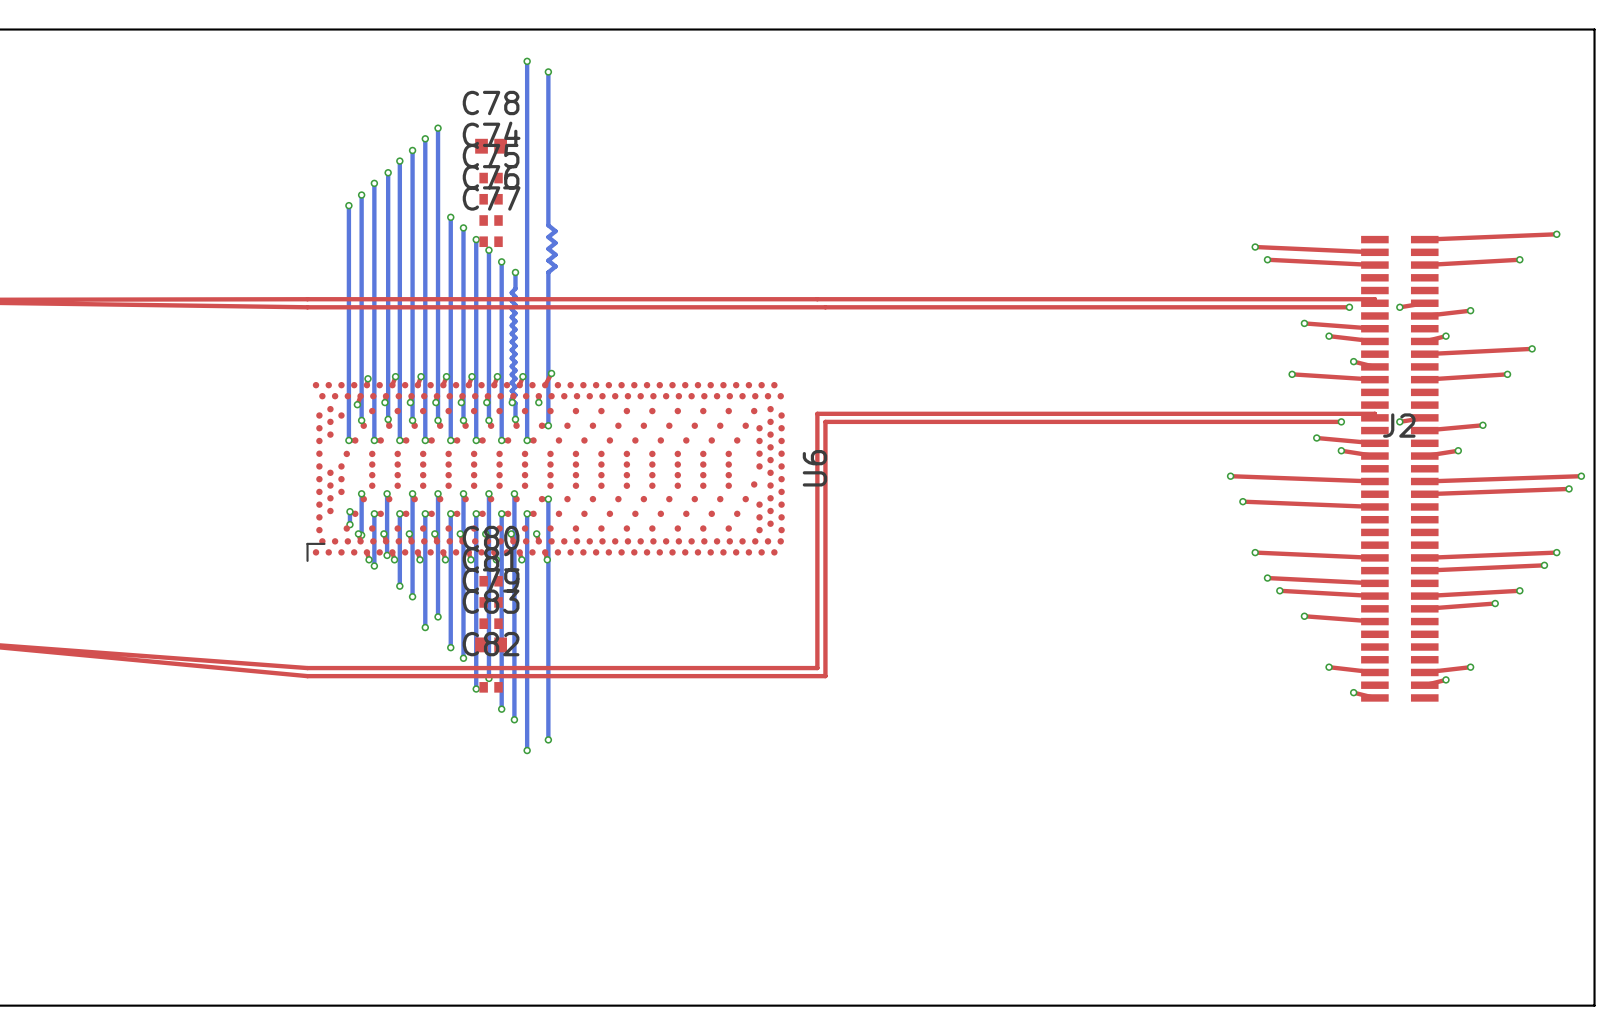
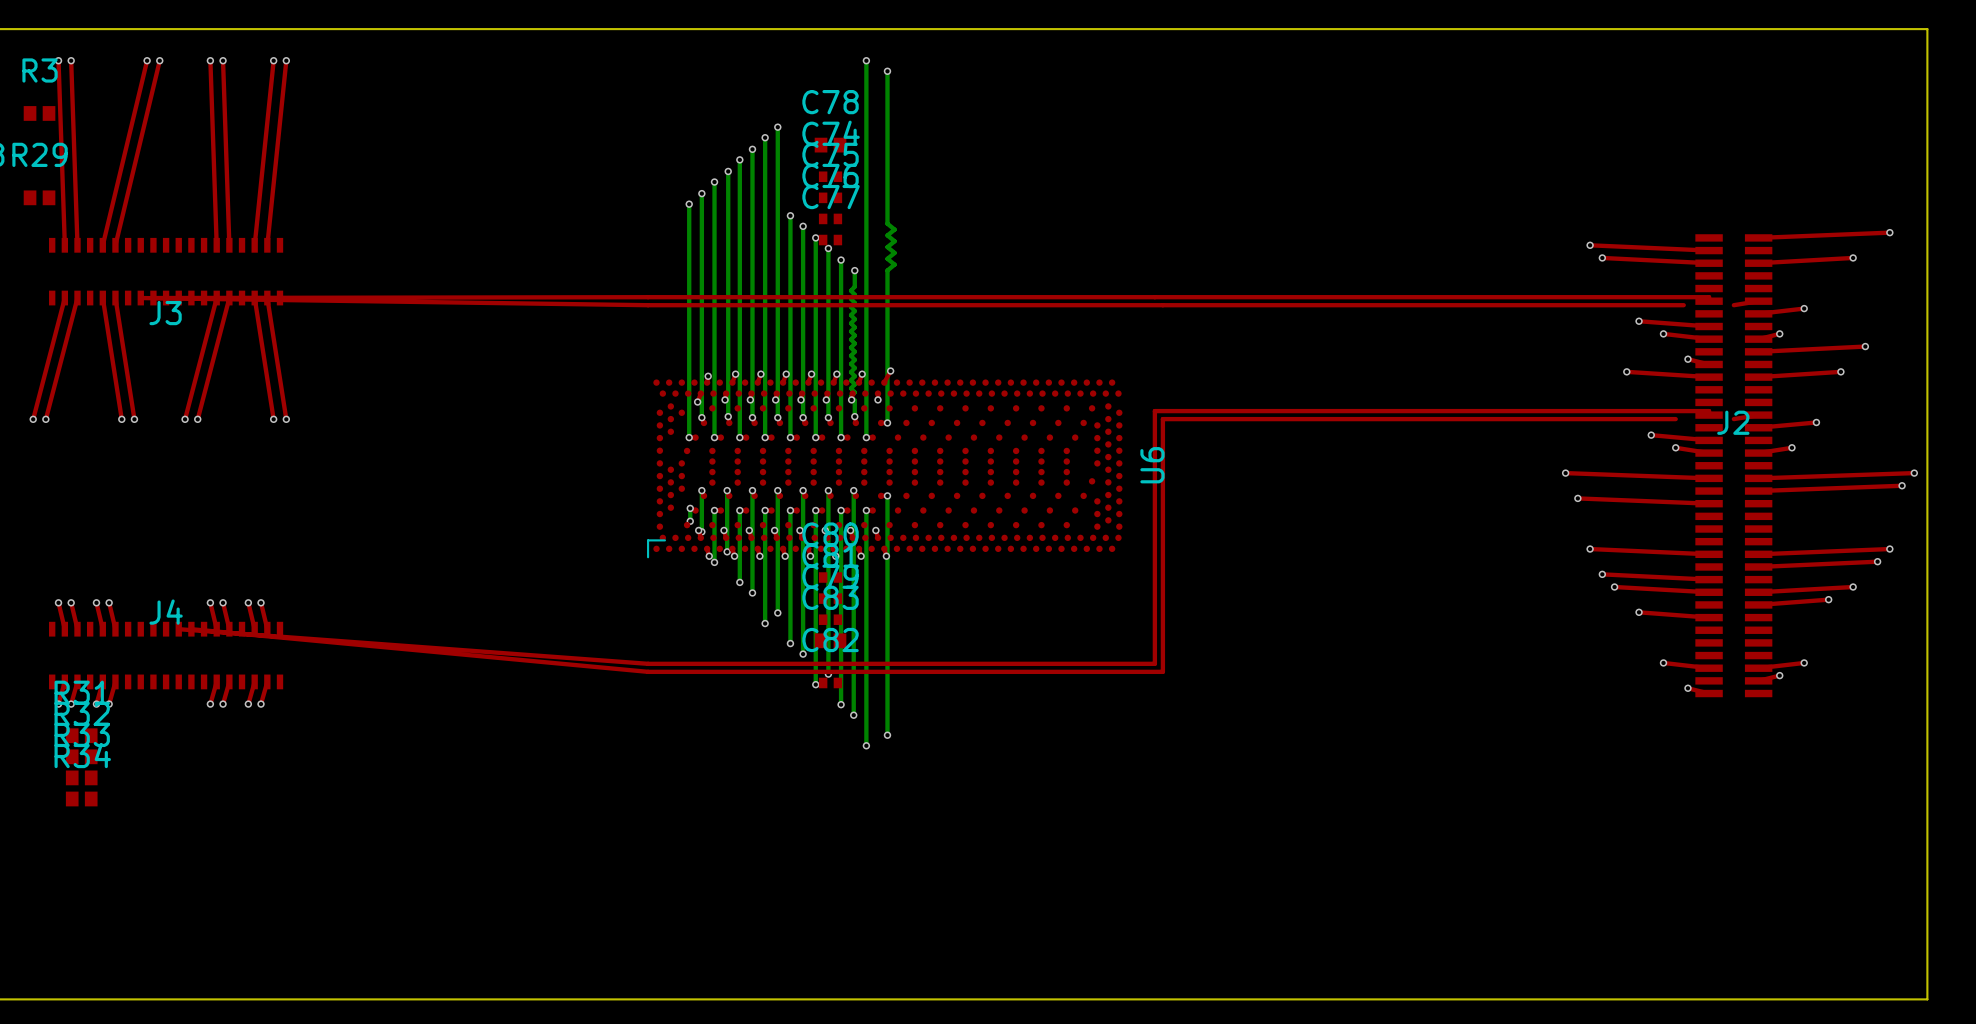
via: (1349, 307) -> none
via: (1399, 307) -> none
via: (1341, 421) -> none
via: (1399, 421) -> none

